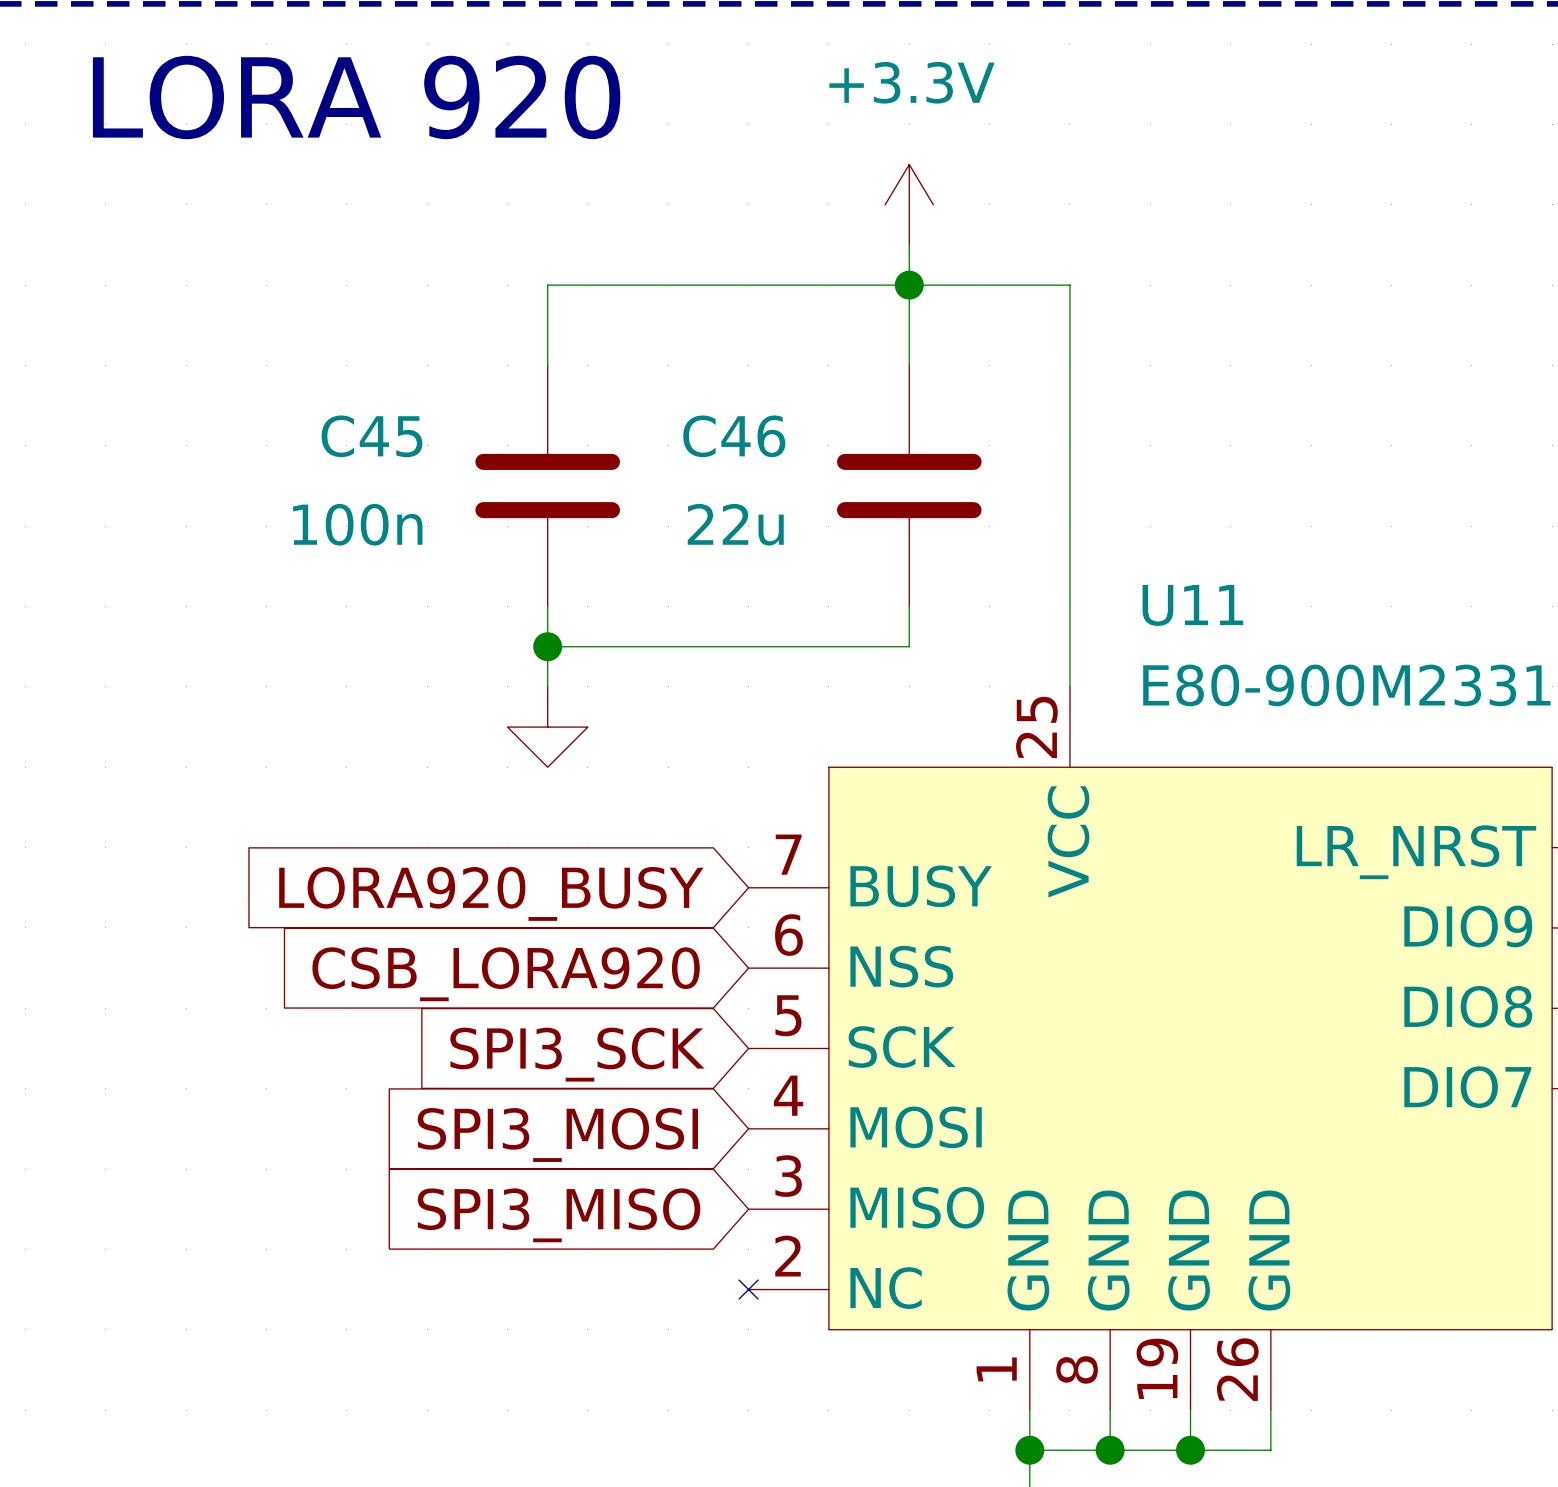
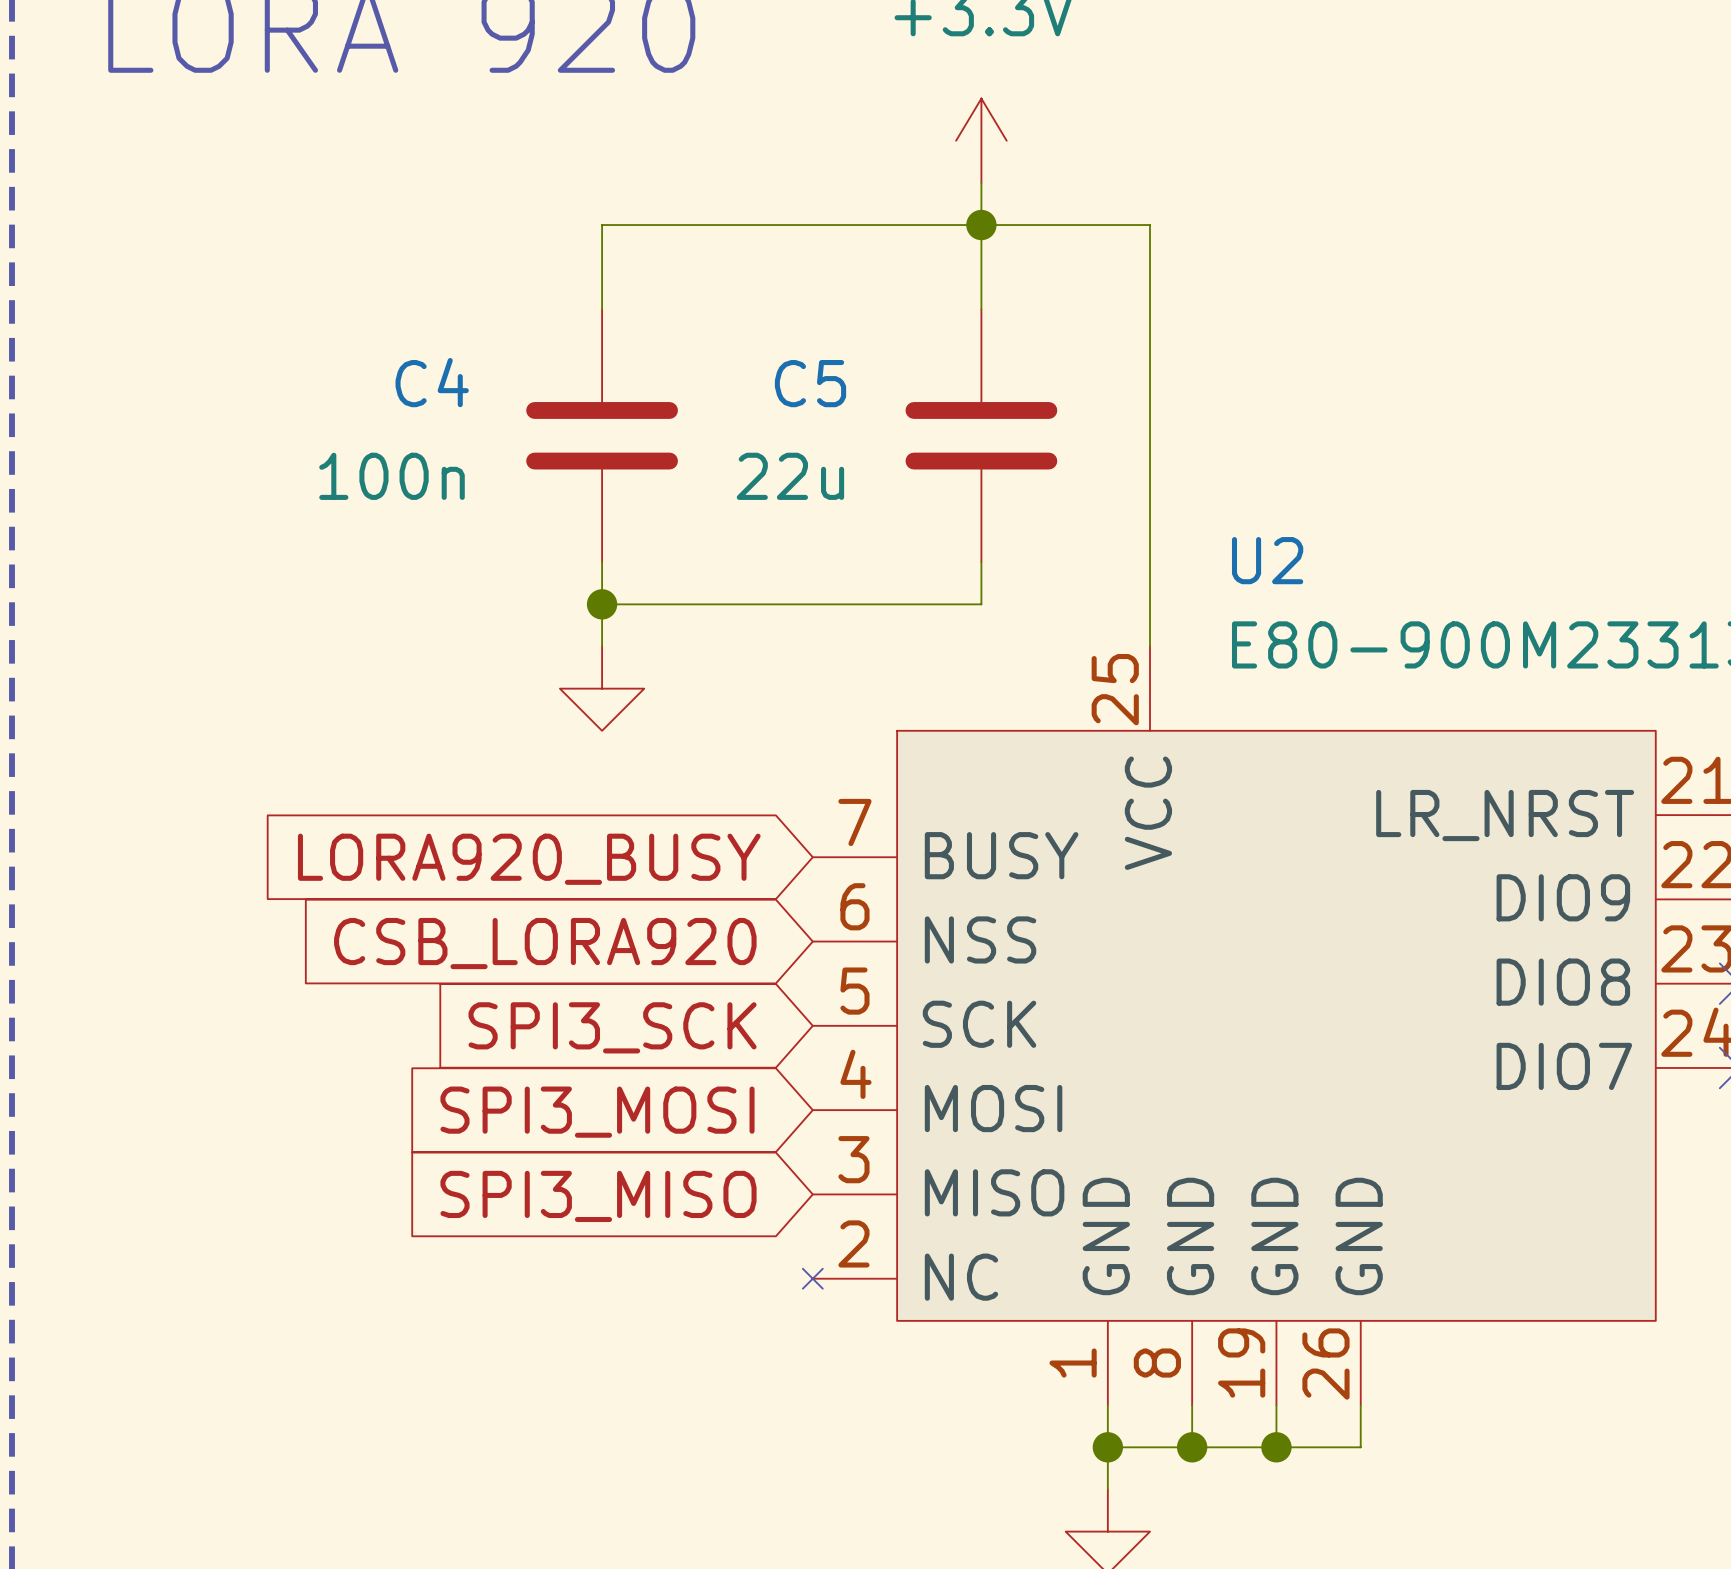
C45 name: C45 (372, 436) -> C4 (432, 382)
C46 name: C46 (734, 436) -> C5 (810, 383)
U11 name: U11 (1192, 605) -> U2 (1267, 560)

